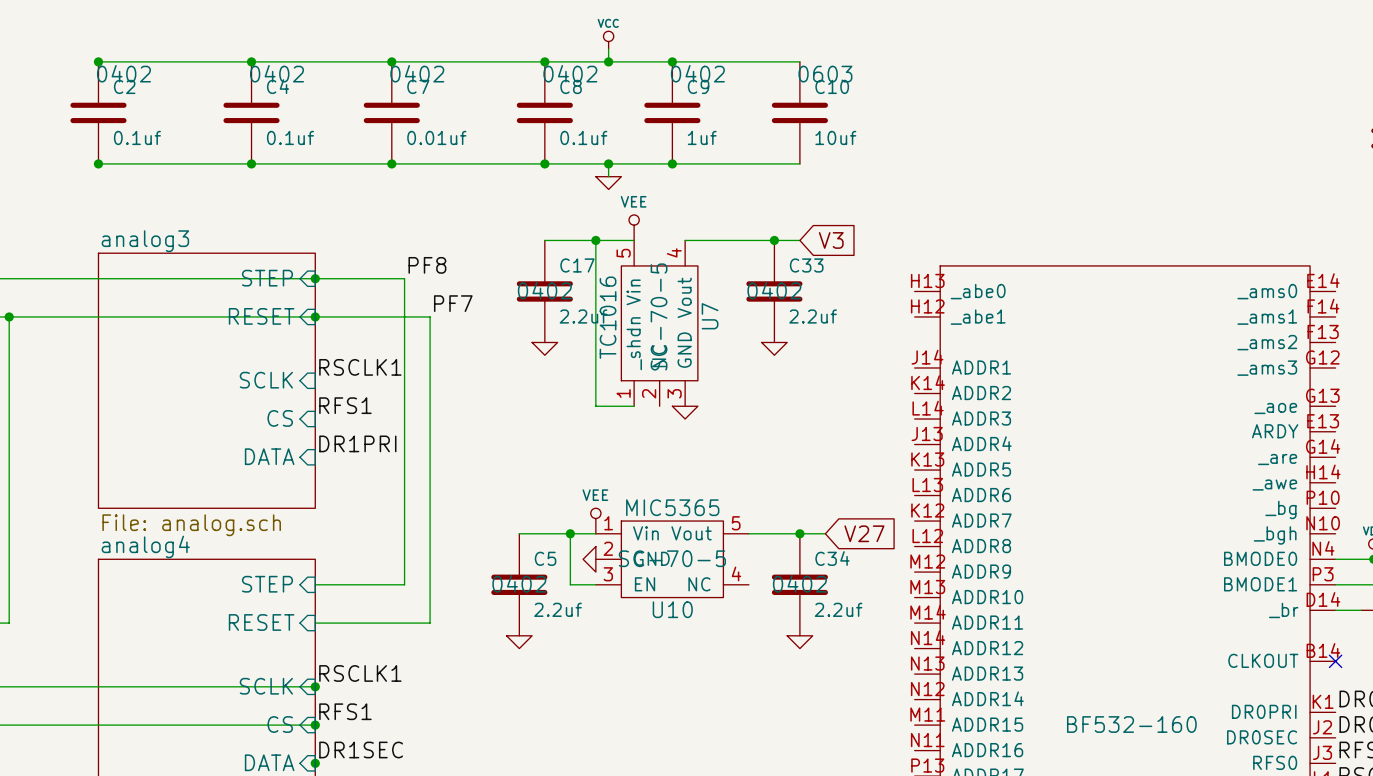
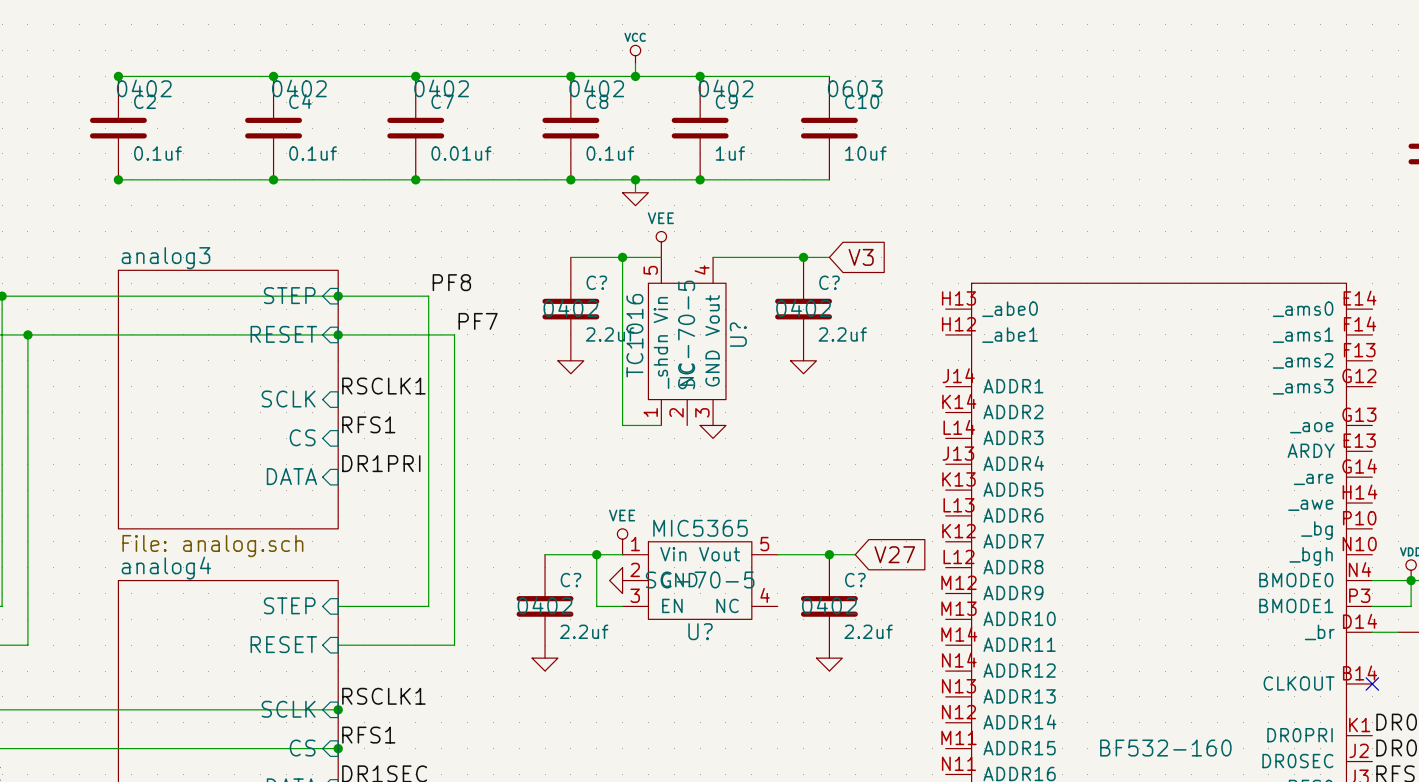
C17 name: C17 (577, 265) -> C? (596, 282)
C33 name: C33 (806, 265) -> C? (829, 282)
U7 name: U7 (710, 316) -> U? (738, 334)
C5 name: C5 (545, 558) -> C? (570, 580)
C34 name: C34 (832, 558) -> C? (855, 580)
U10 name: U10 (672, 609) -> U? (700, 631)

